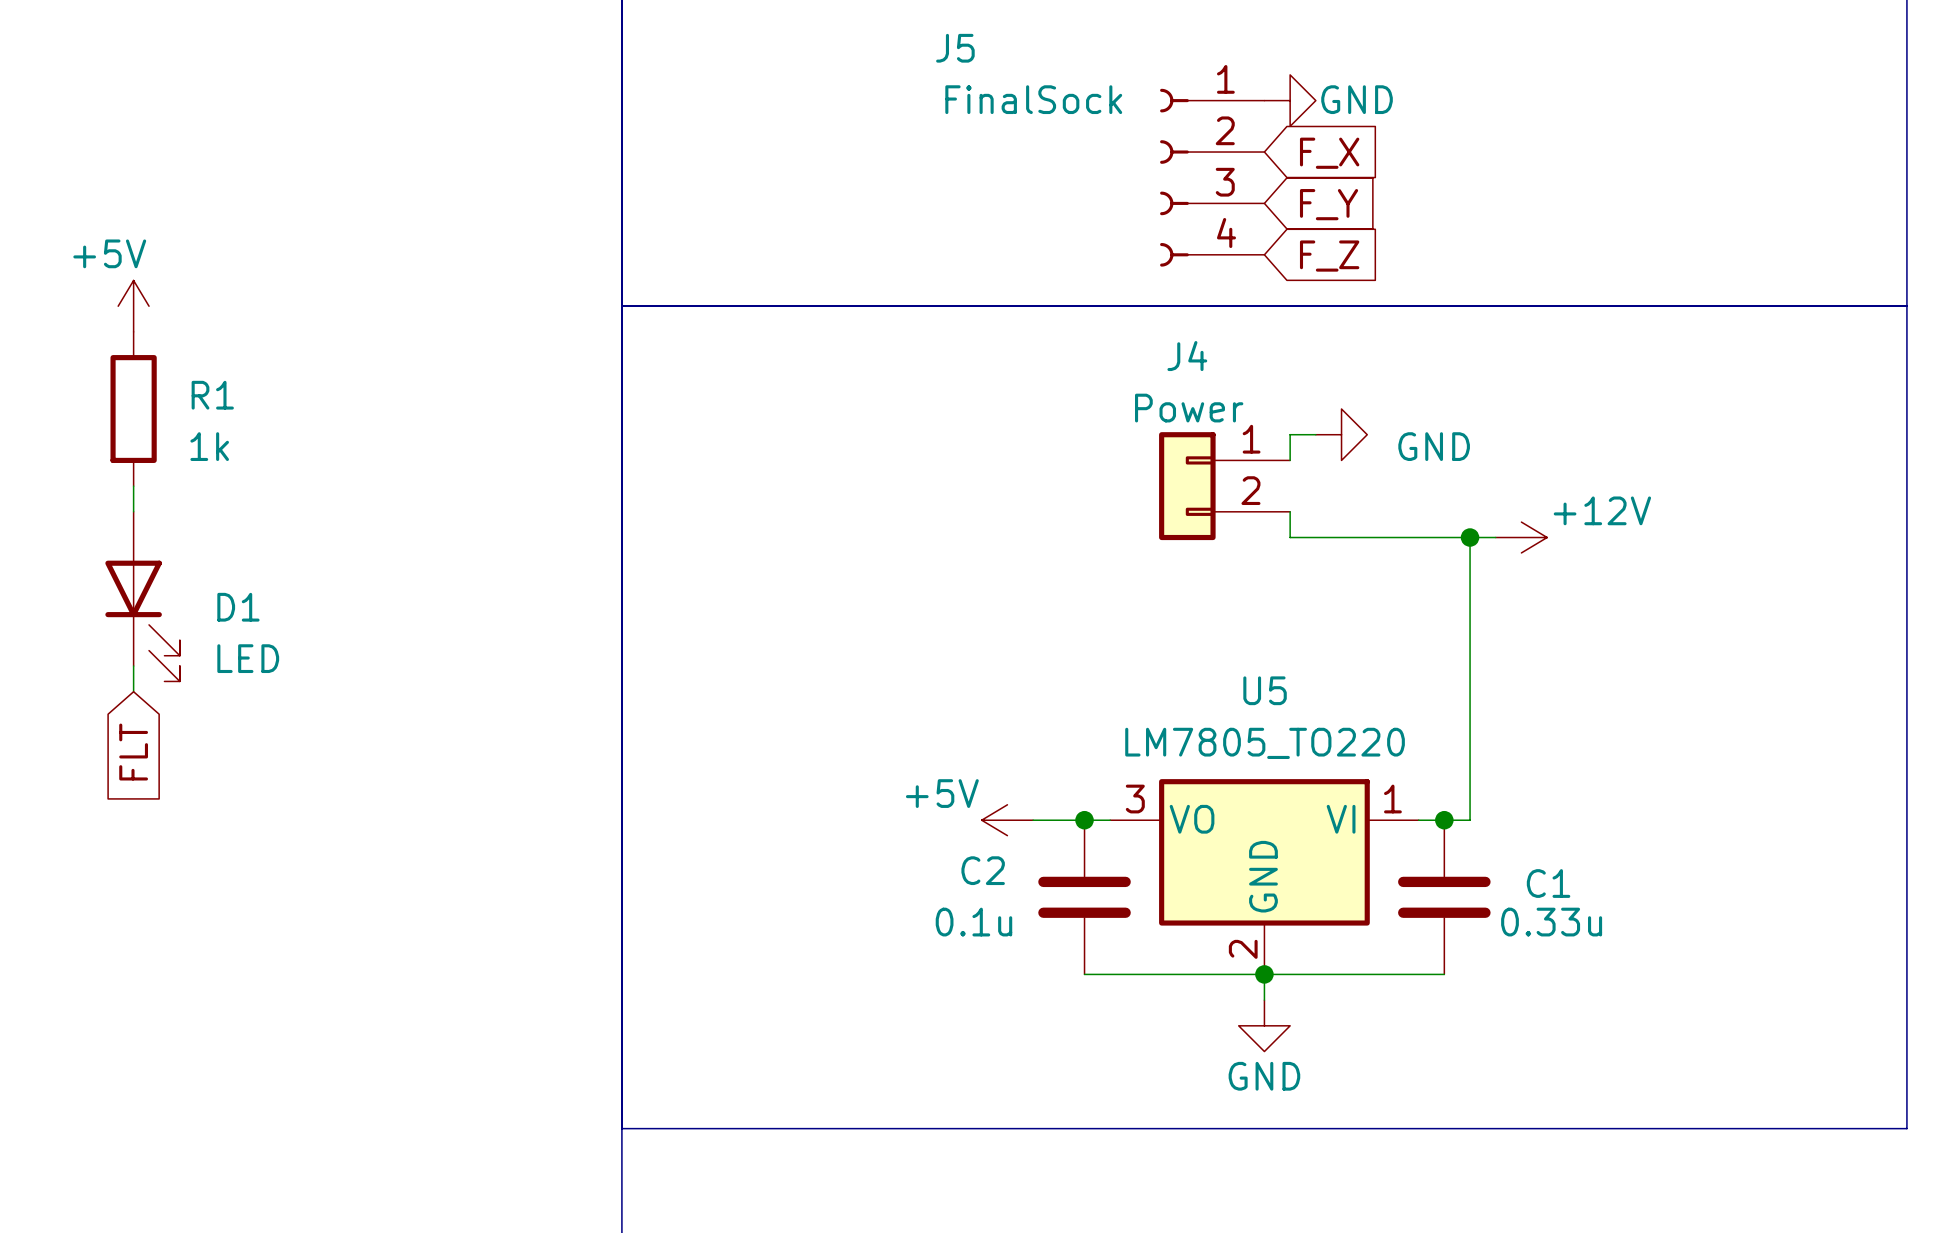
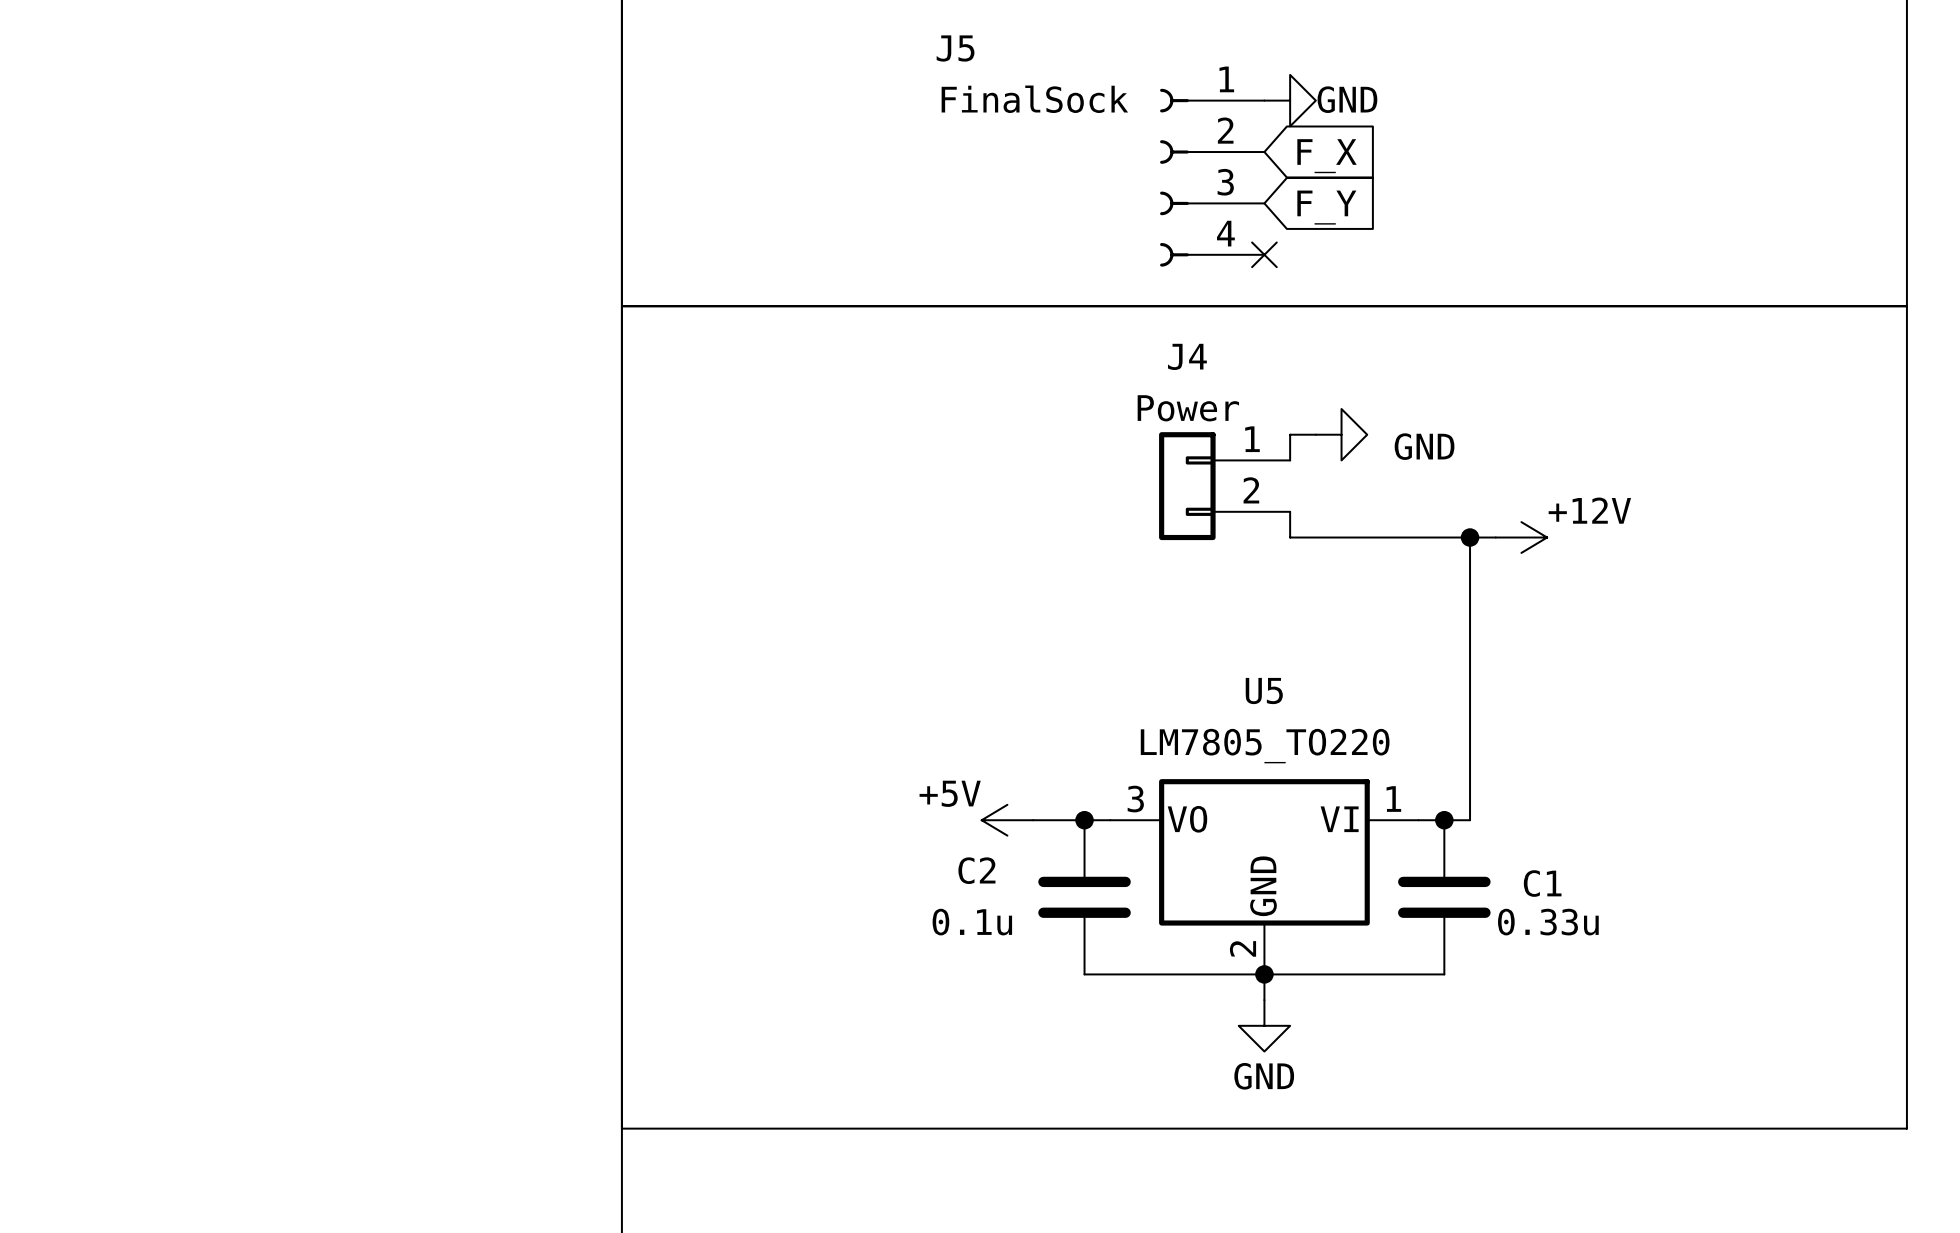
no-connect mark: none -> (1264, 254)
global label: F_Z (1329, 256) -> none
power symbol: +5V (133, 306) -> none
R1: 1k (133, 409) -> none
wire: (133, 486) (133, 511) -> none
D1: LED (142, 596) -> none
wire: (133, 666) (133, 691) -> none
global label: FLT (133, 752) -> none

